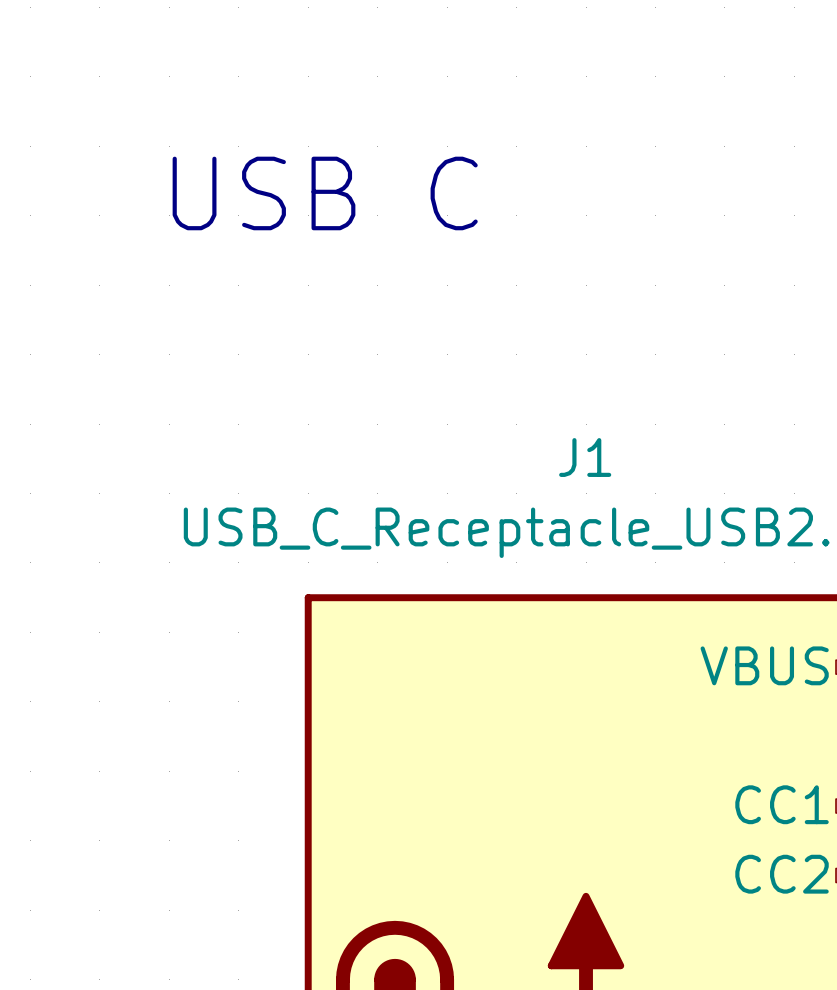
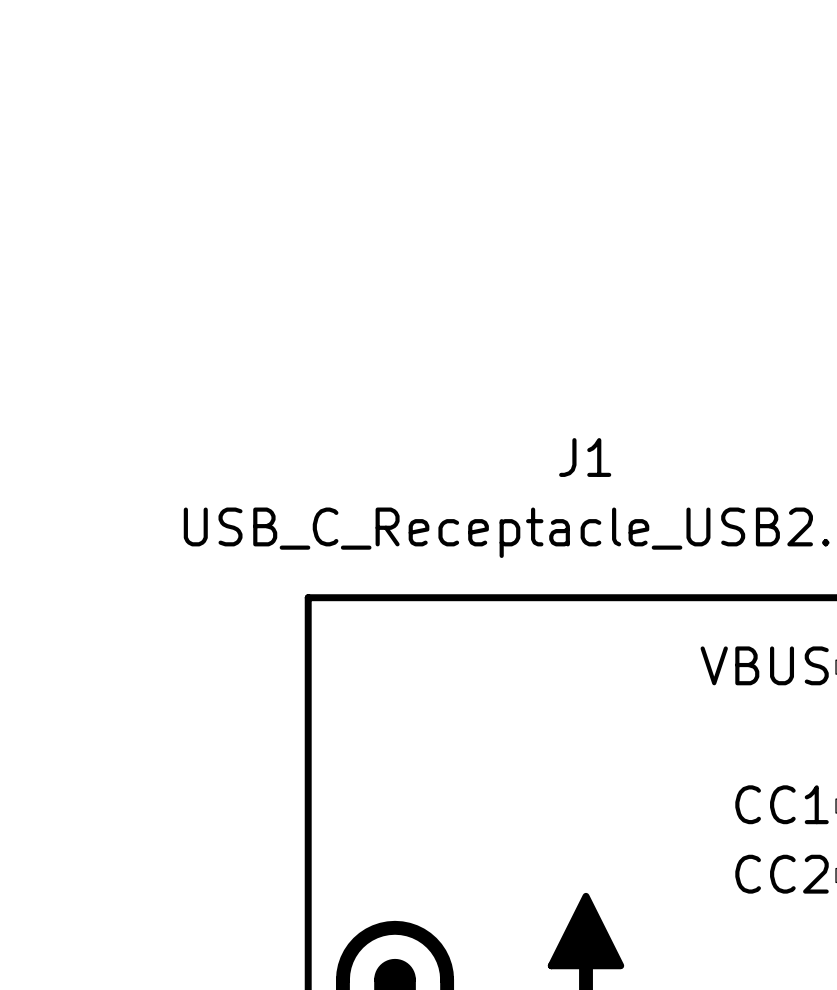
text: USB C (325, 193) -> none

